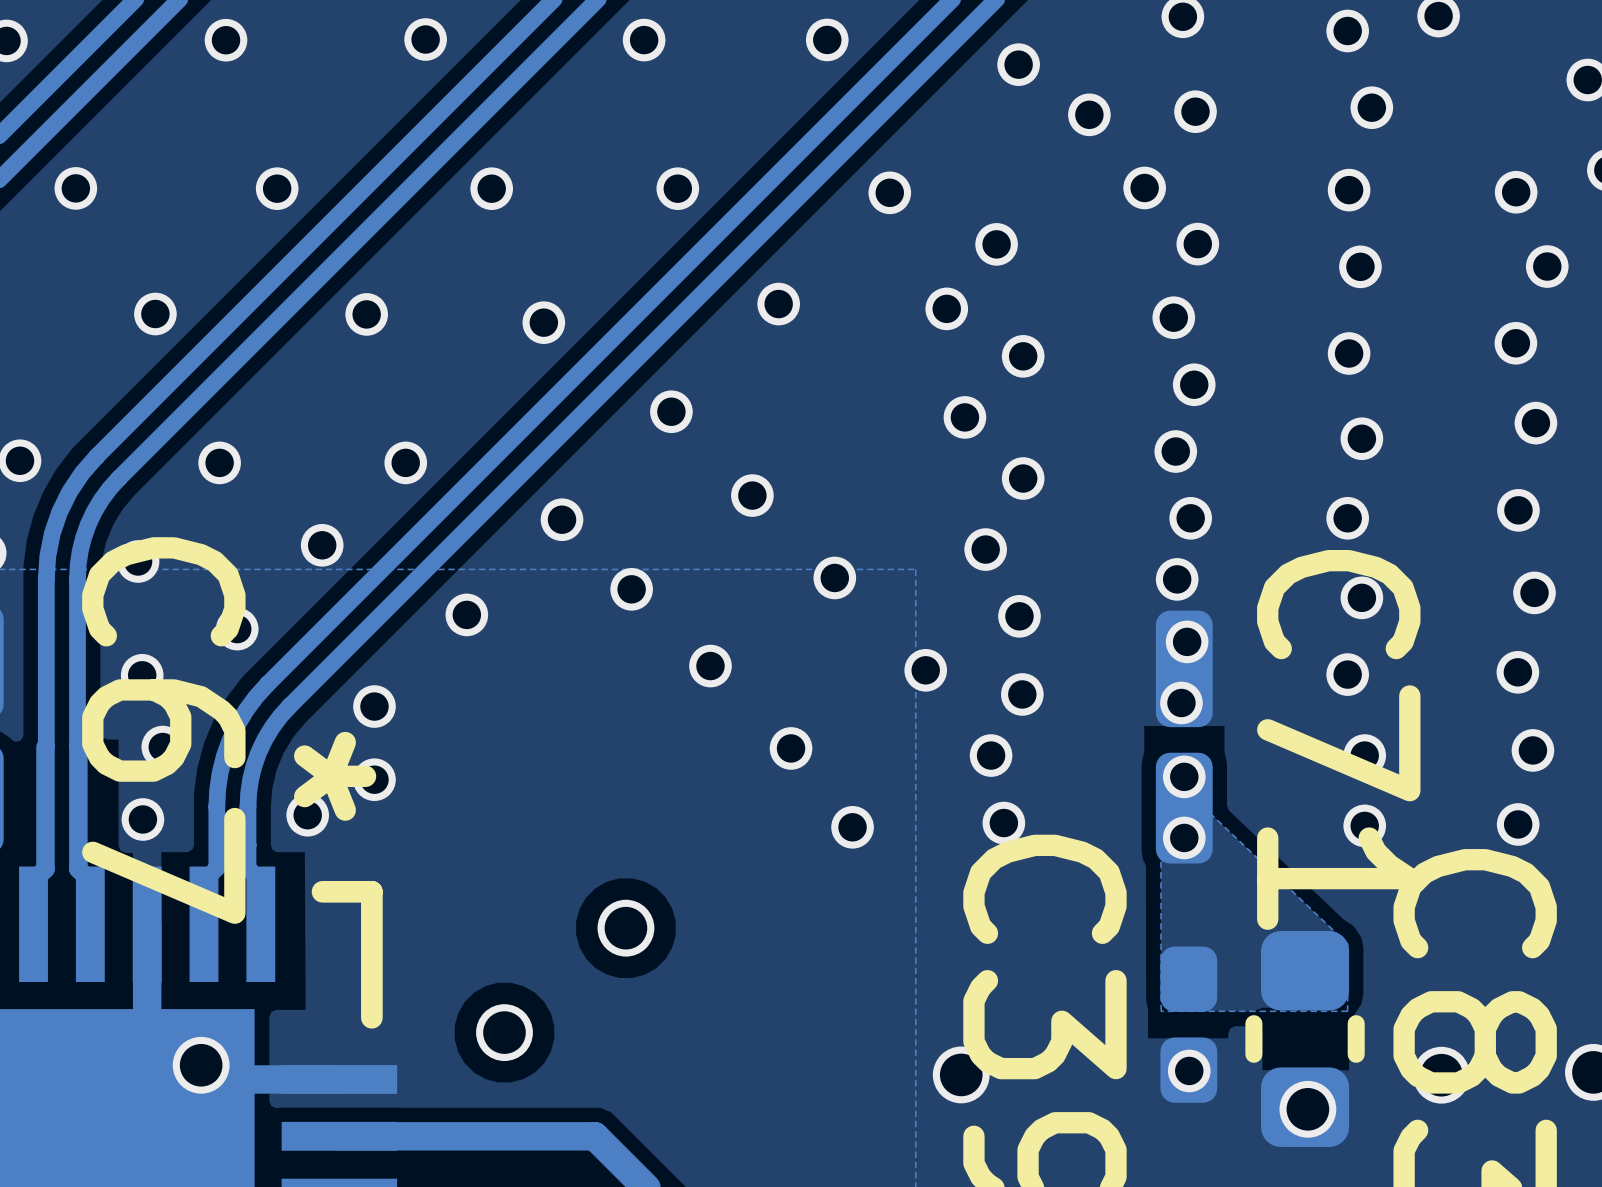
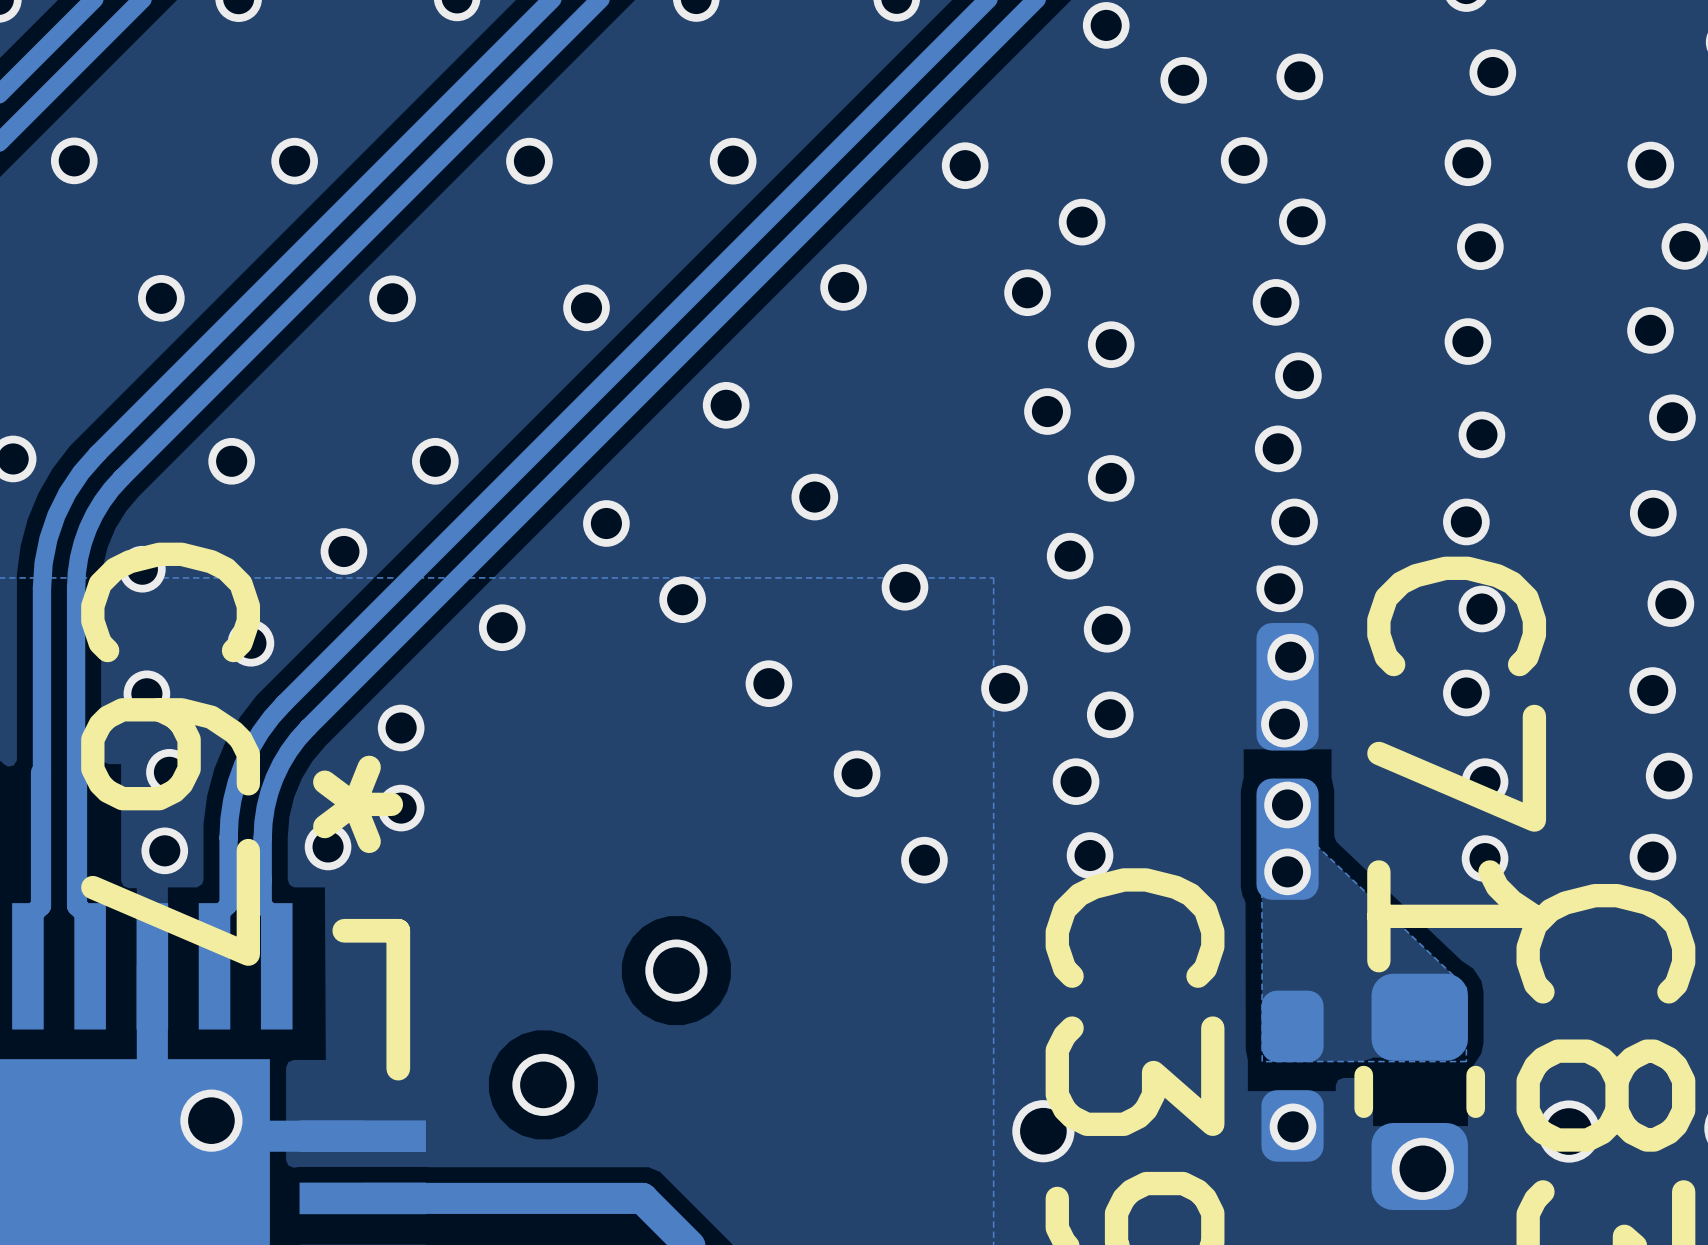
via position: (142, 819) -> (164, 850)

